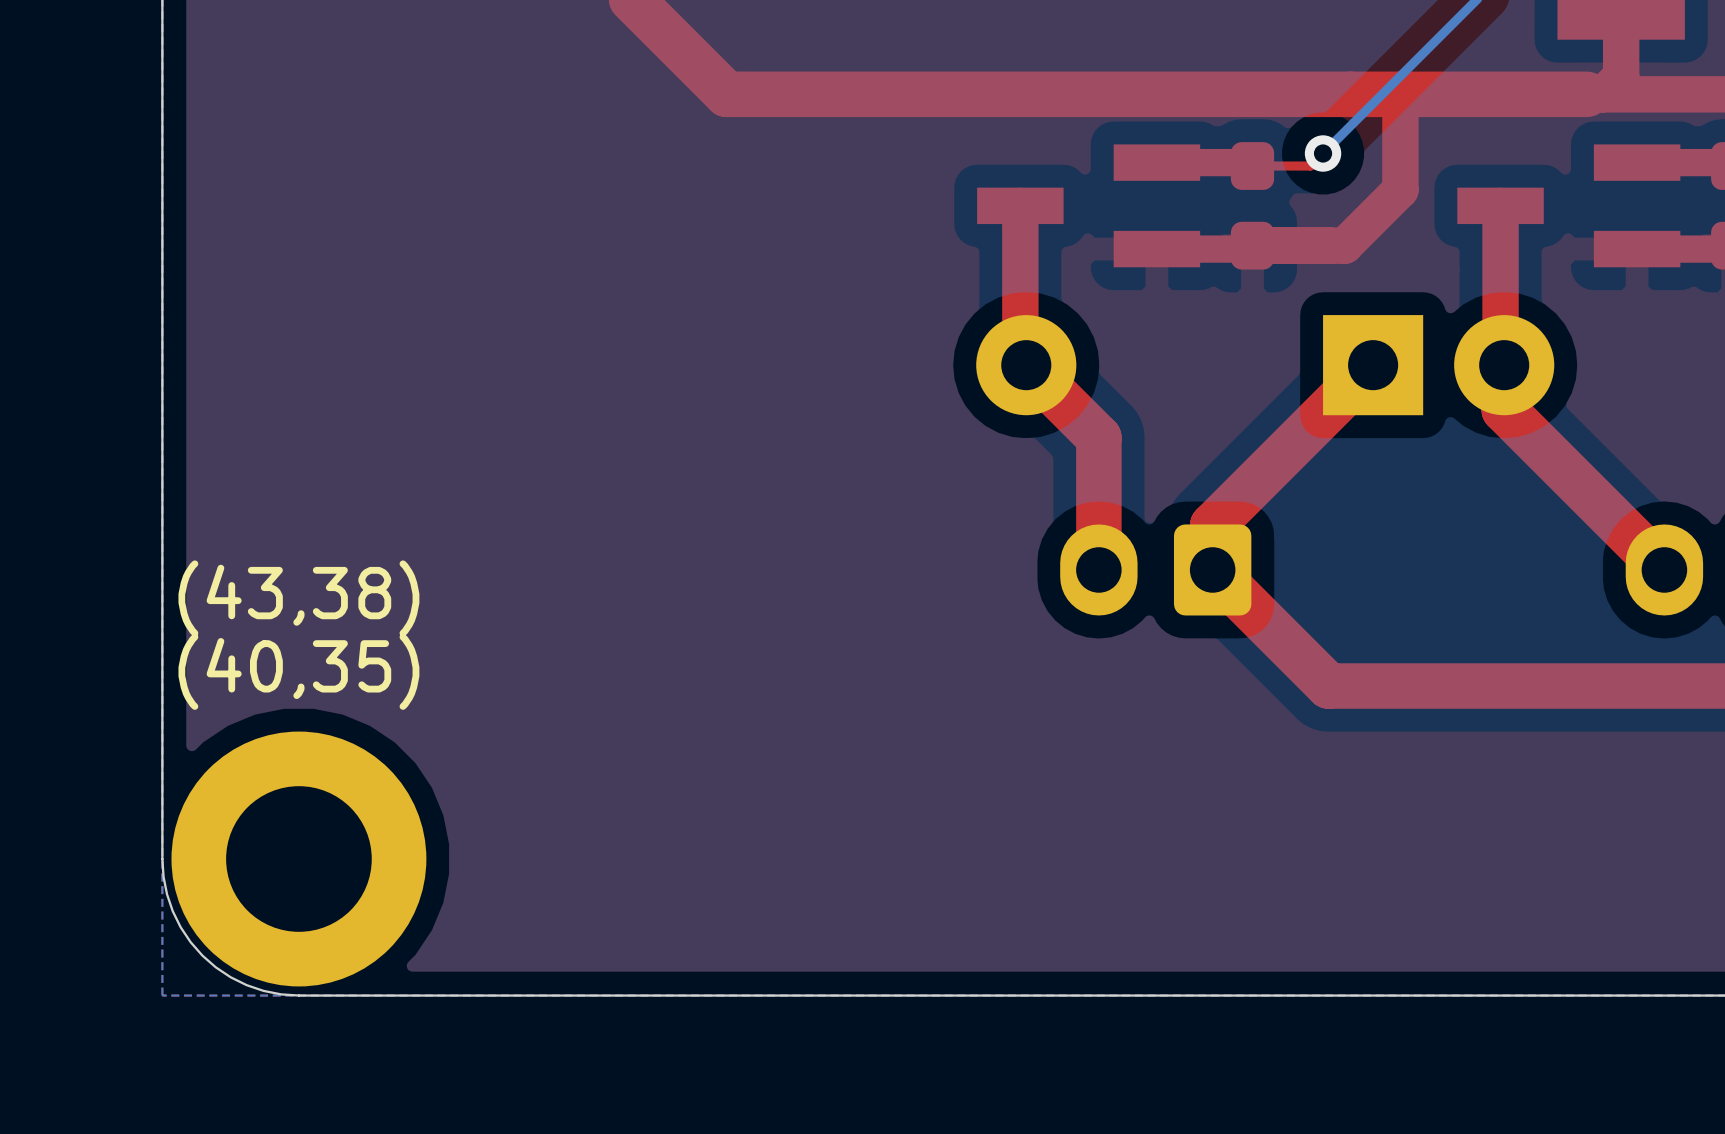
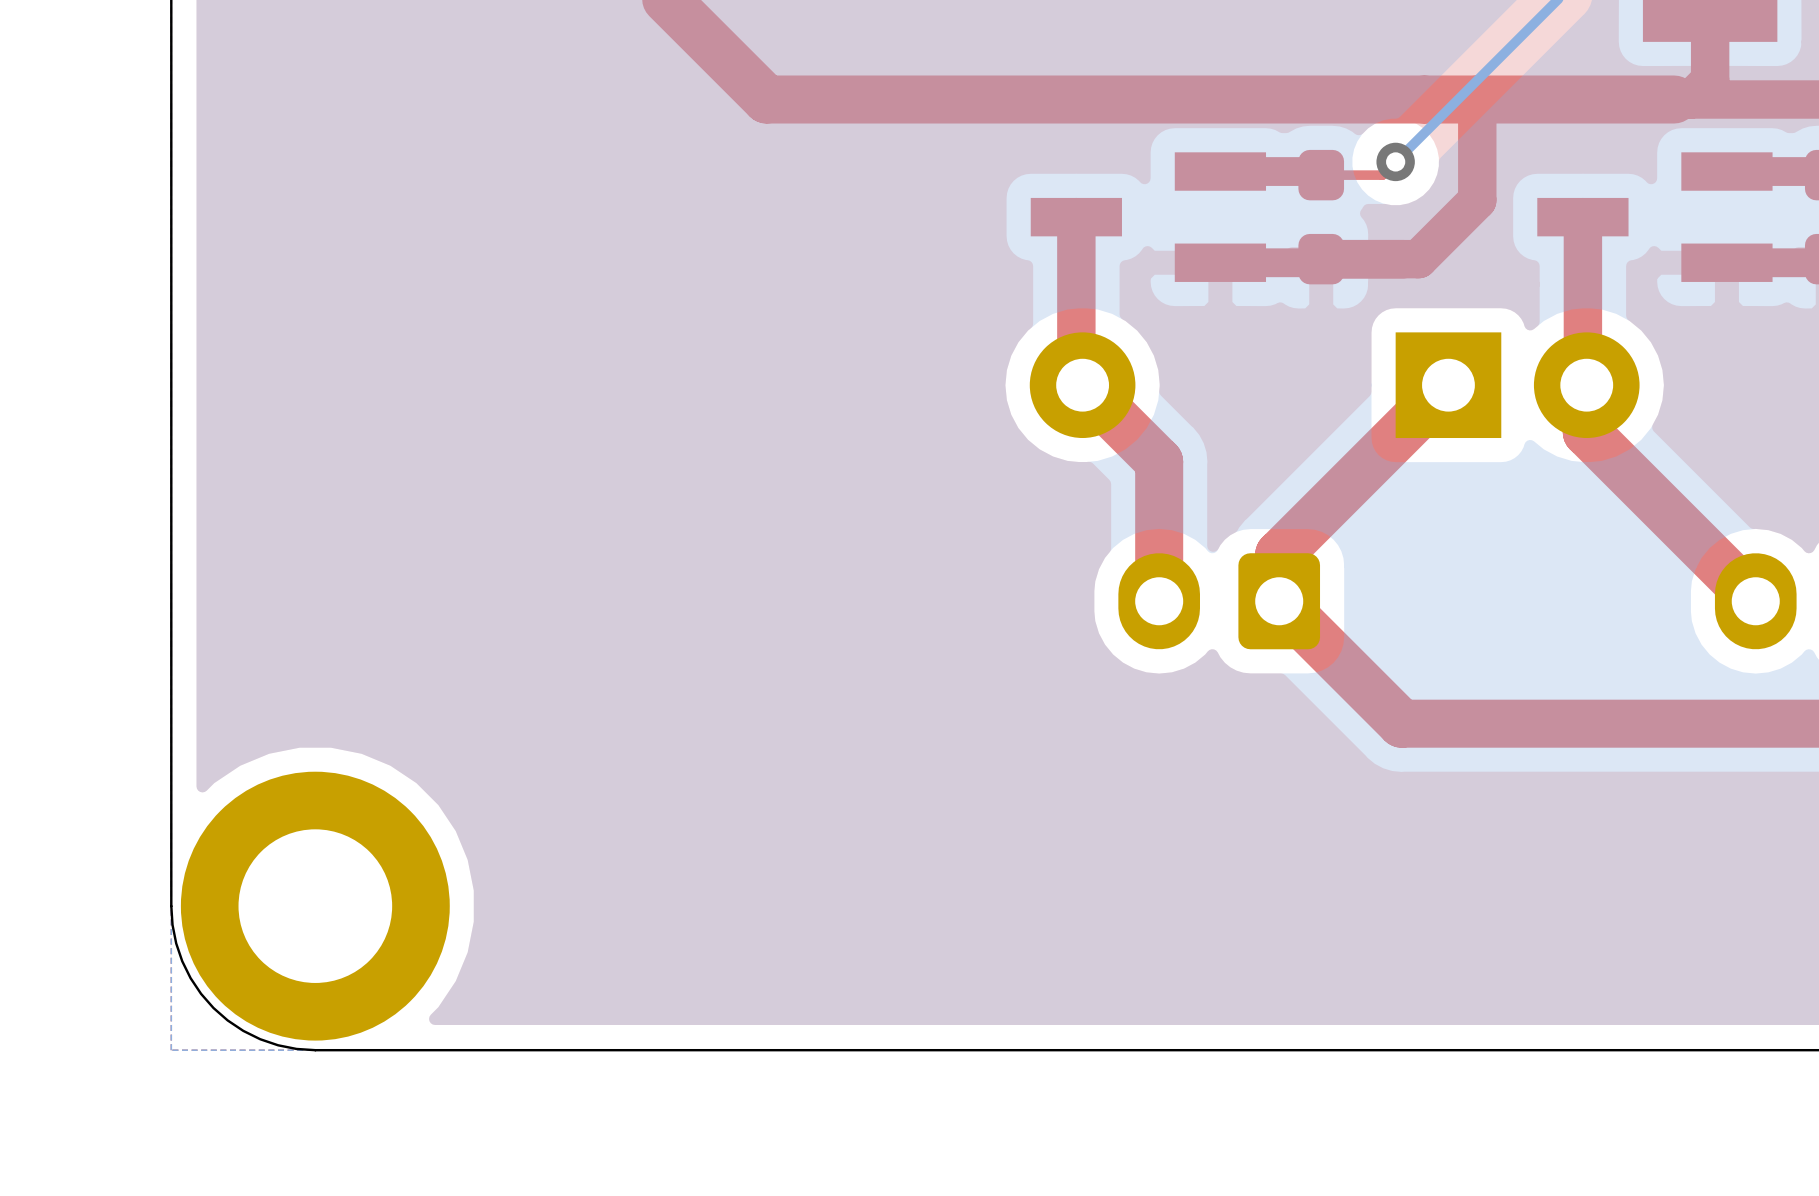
text: (43,38) (298, 598) -> none
text: (40,35) (298, 671) -> none

